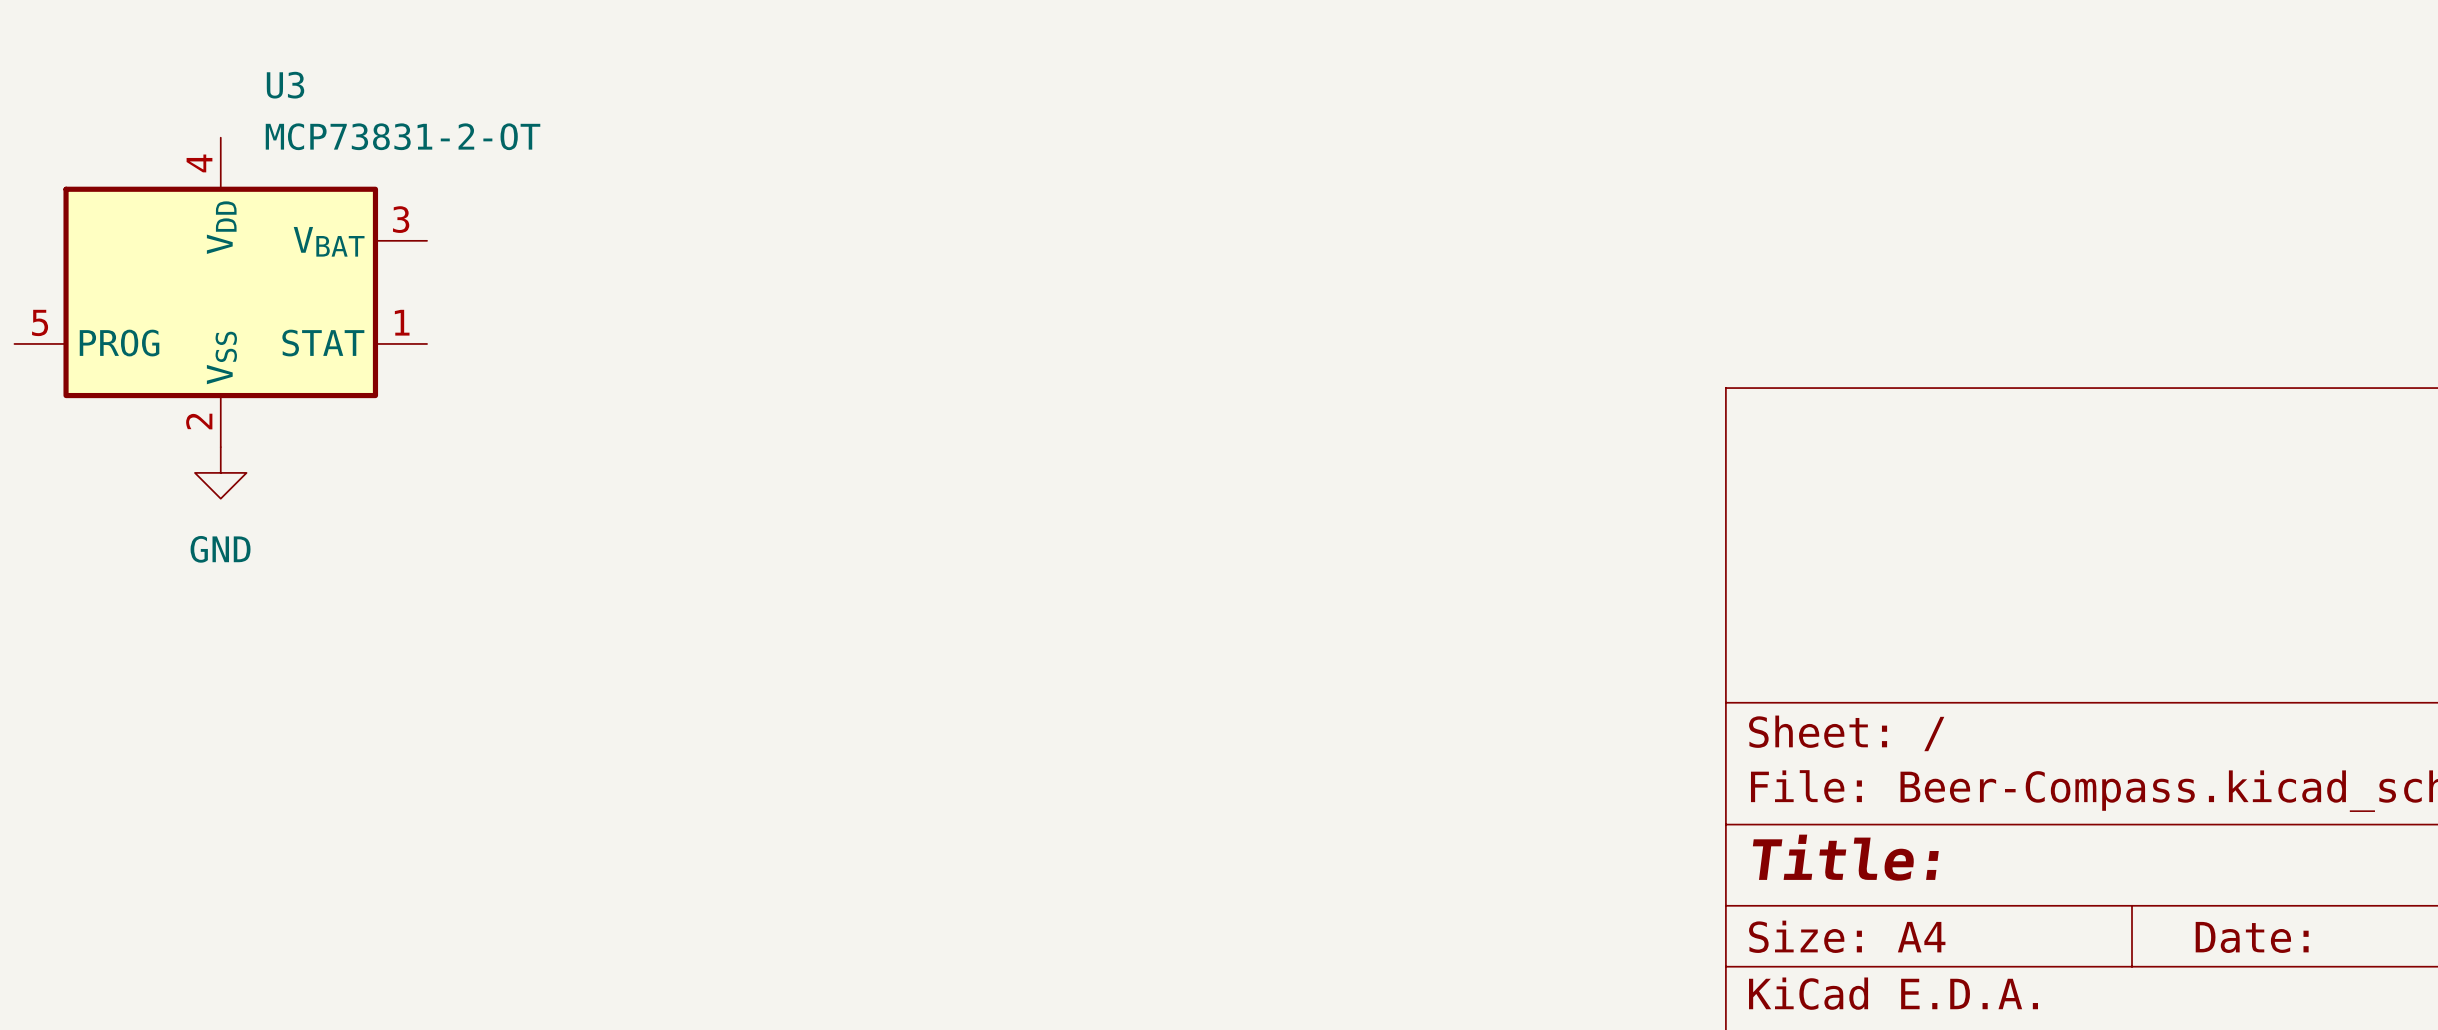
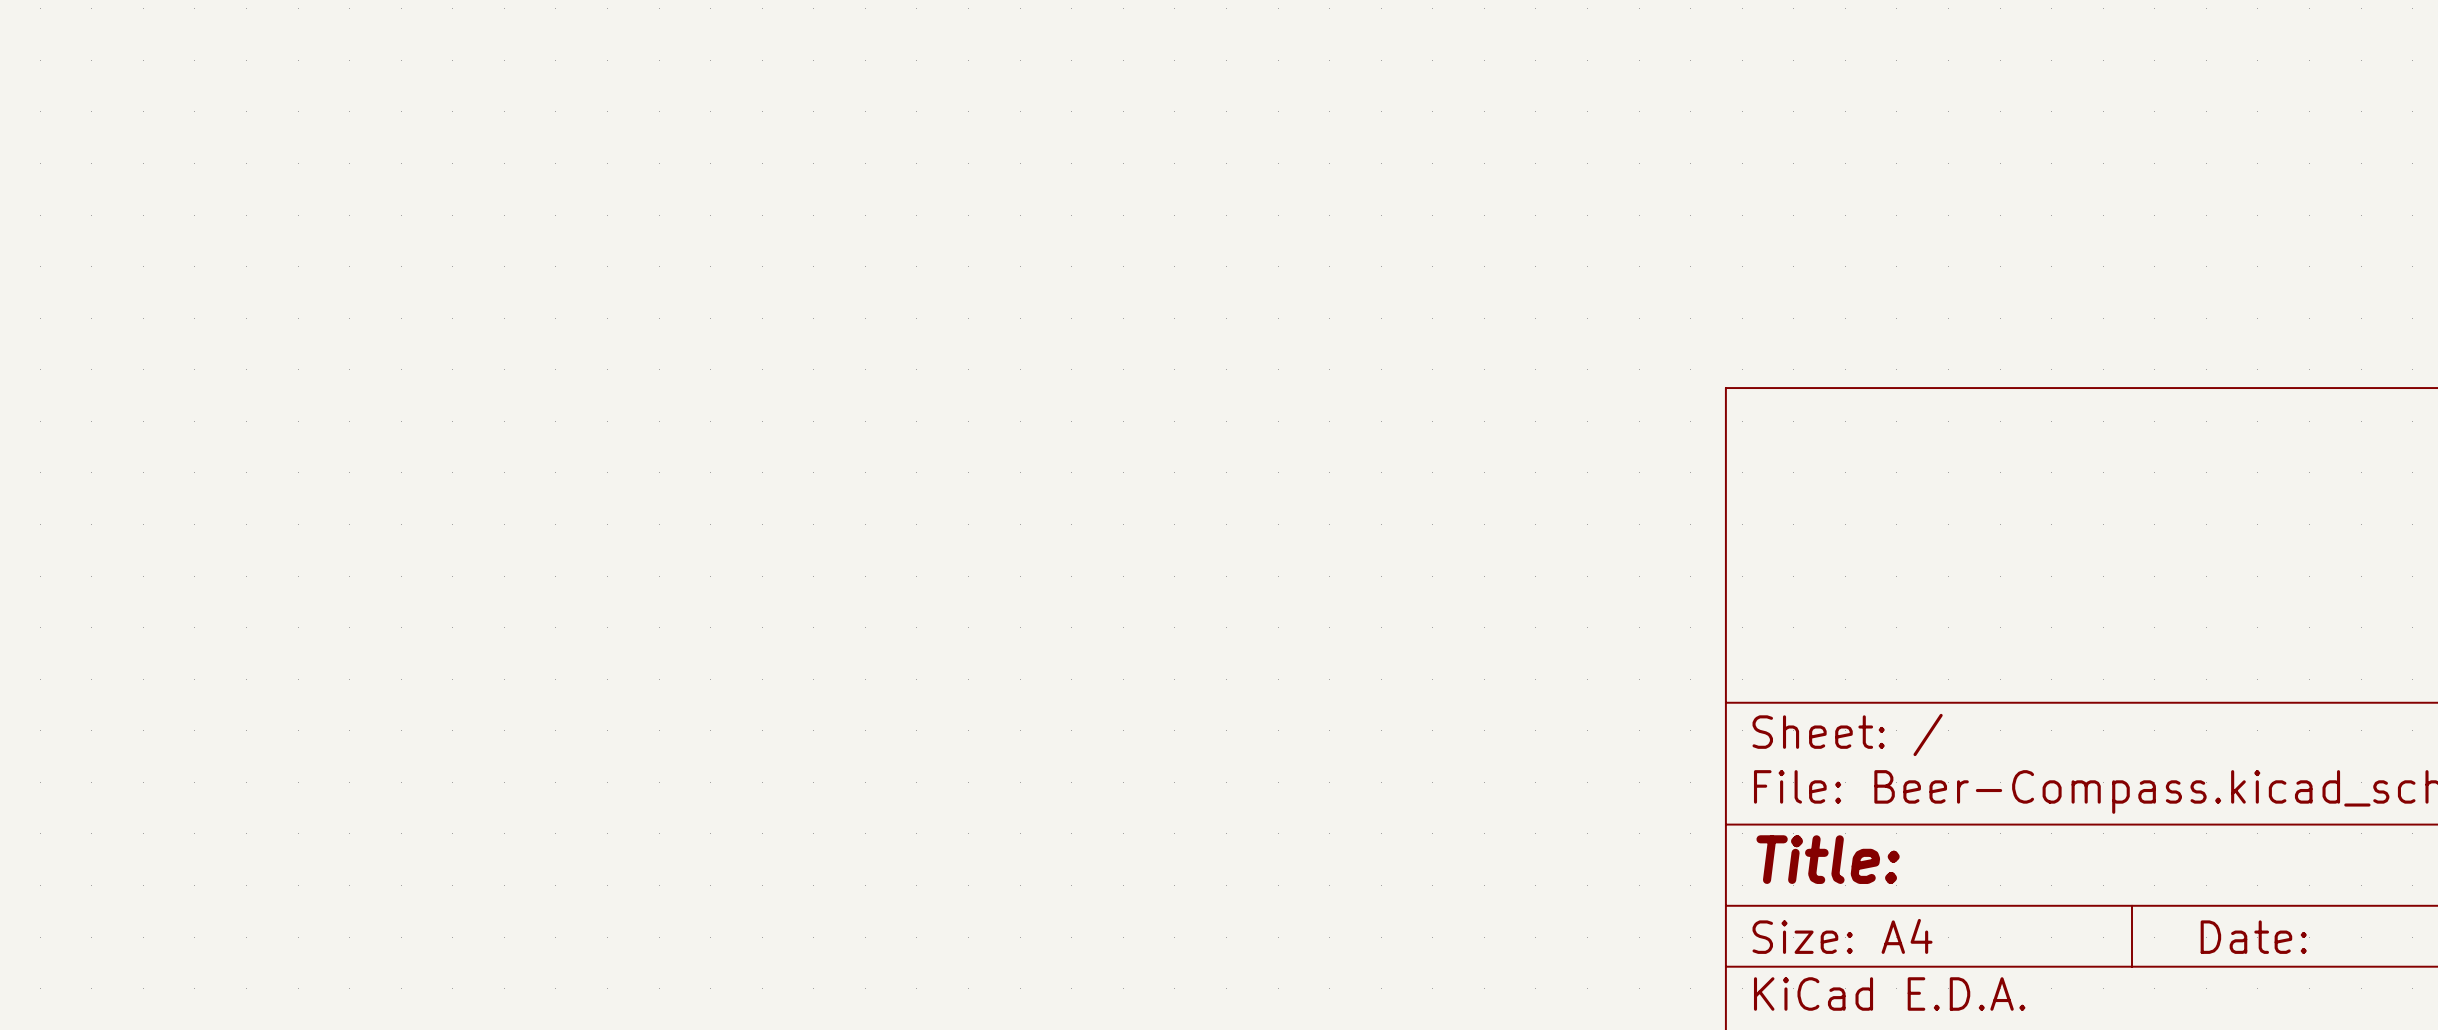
U3: MCP73831-2-OT (220, 292) -> none
power symbol: GND (220, 472) -> none

